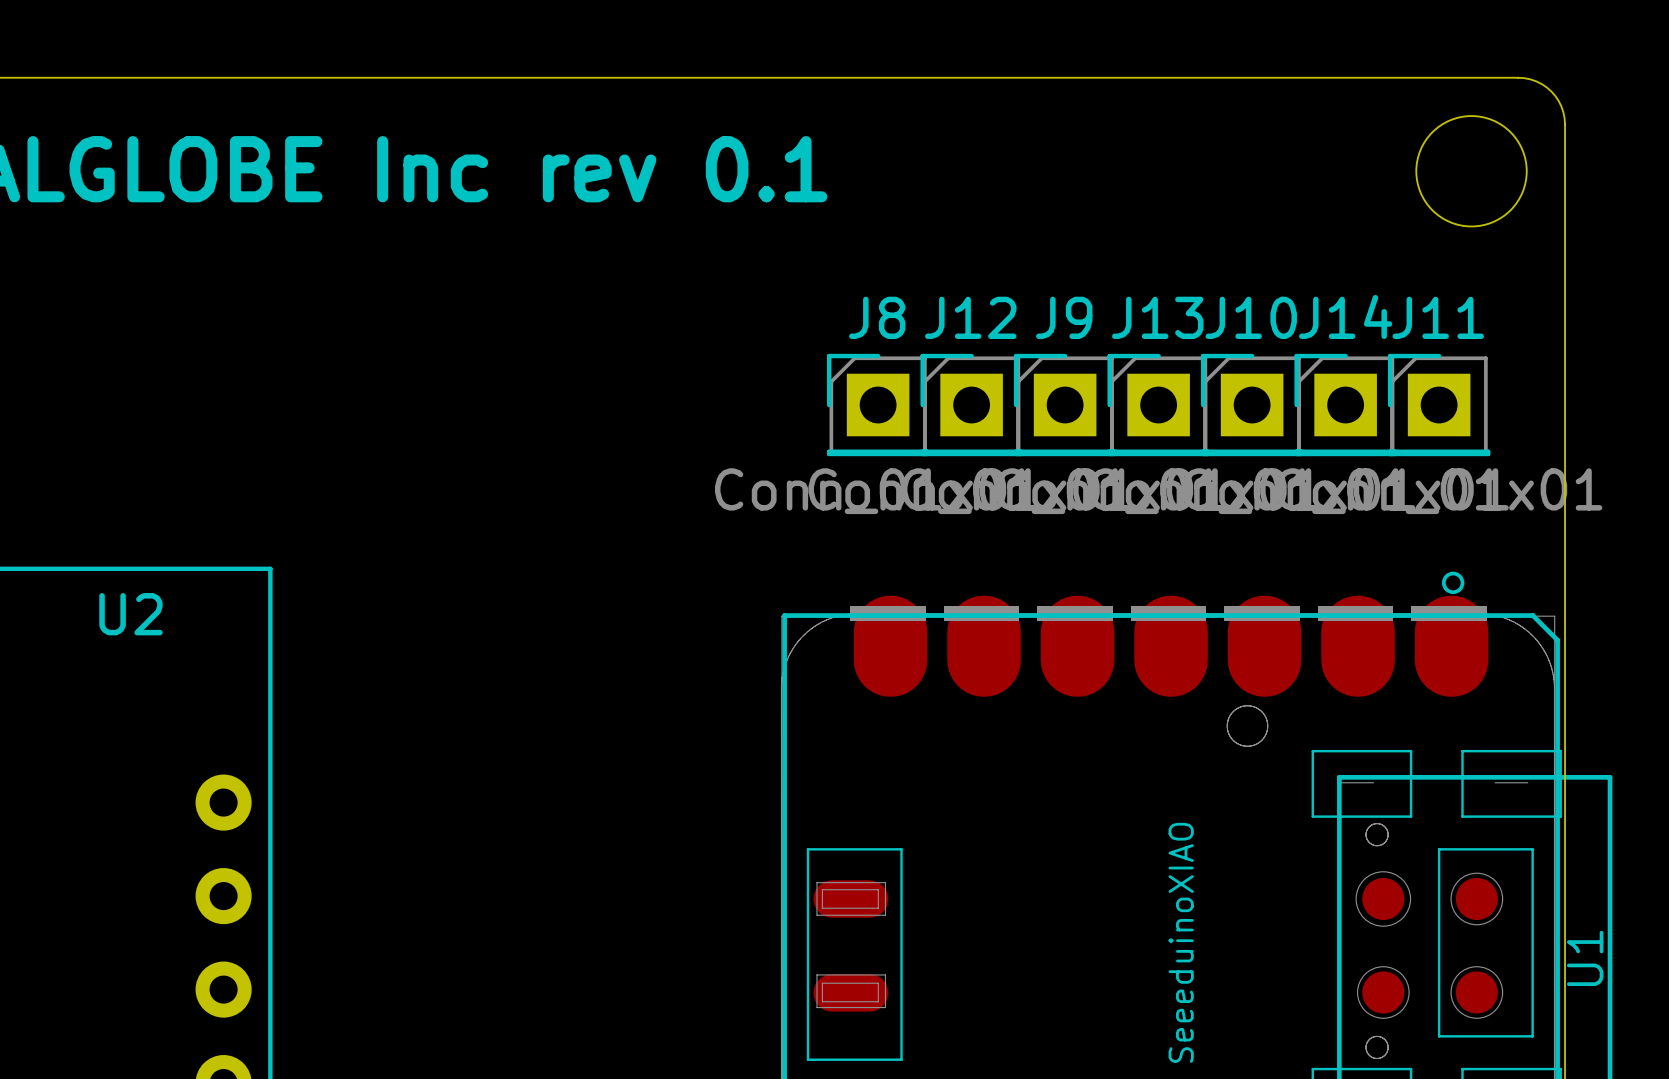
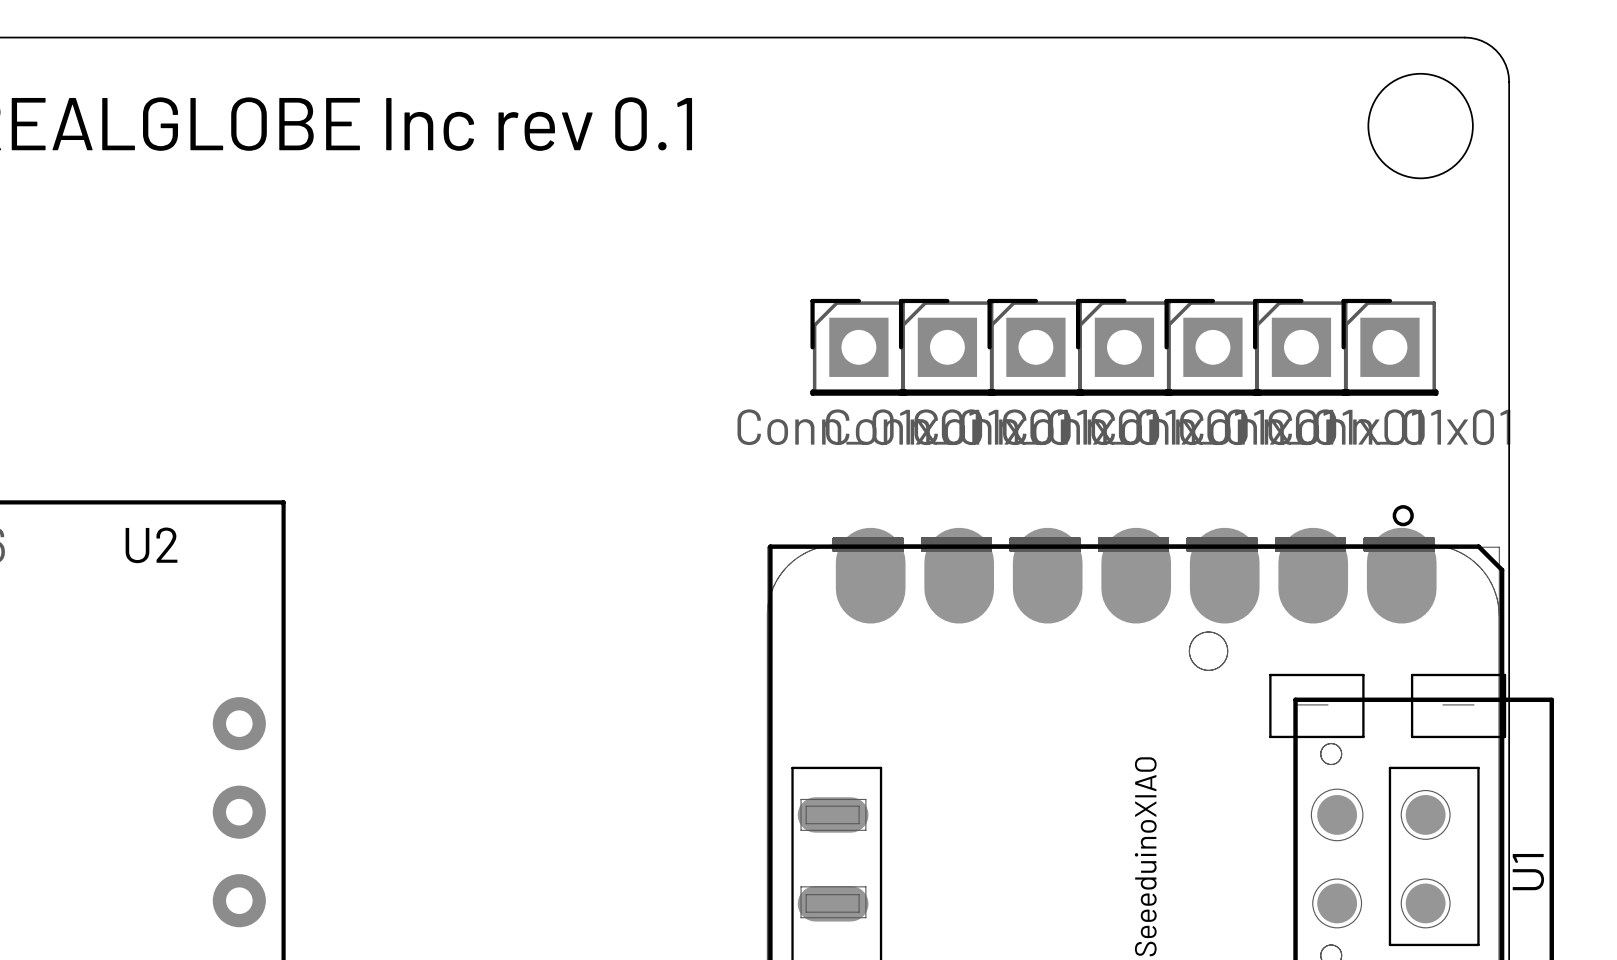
J14 name: J14 (1345, 316) -> none
J8 name: J8 (877, 317) -> none
J12 name: J12 (970, 317) -> none
J9 name: J9 (1064, 317) -> none
J13 name: J13 (1157, 317) -> none
J10 name: J10 (1251, 317) -> none
J11 name: J11 (1438, 317) -> none

